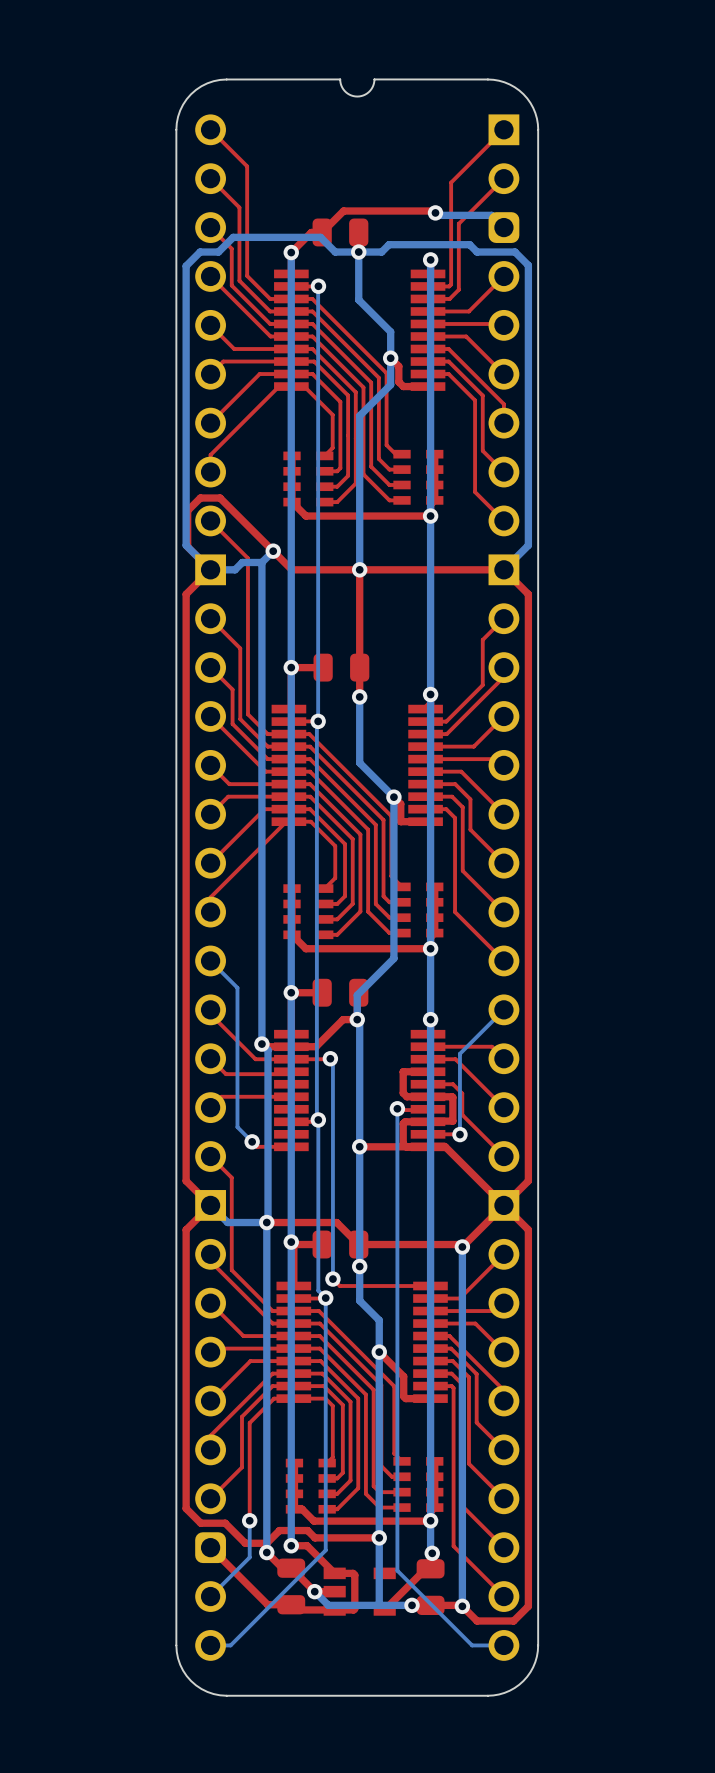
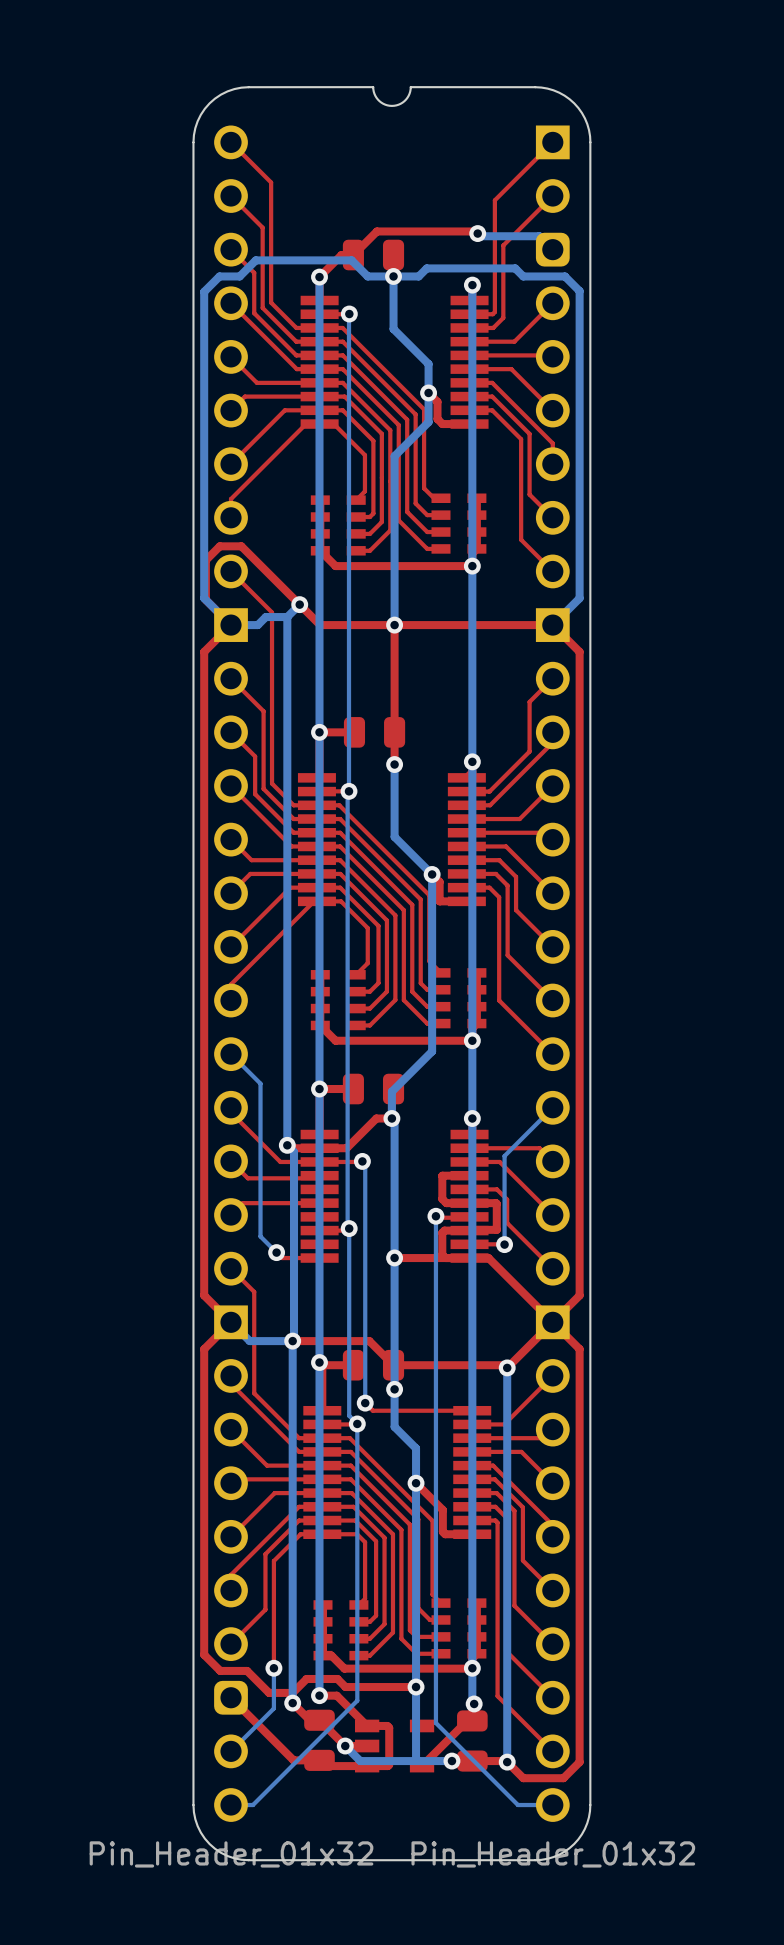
drawing: none -> [89, 1841, 696, 1868]

